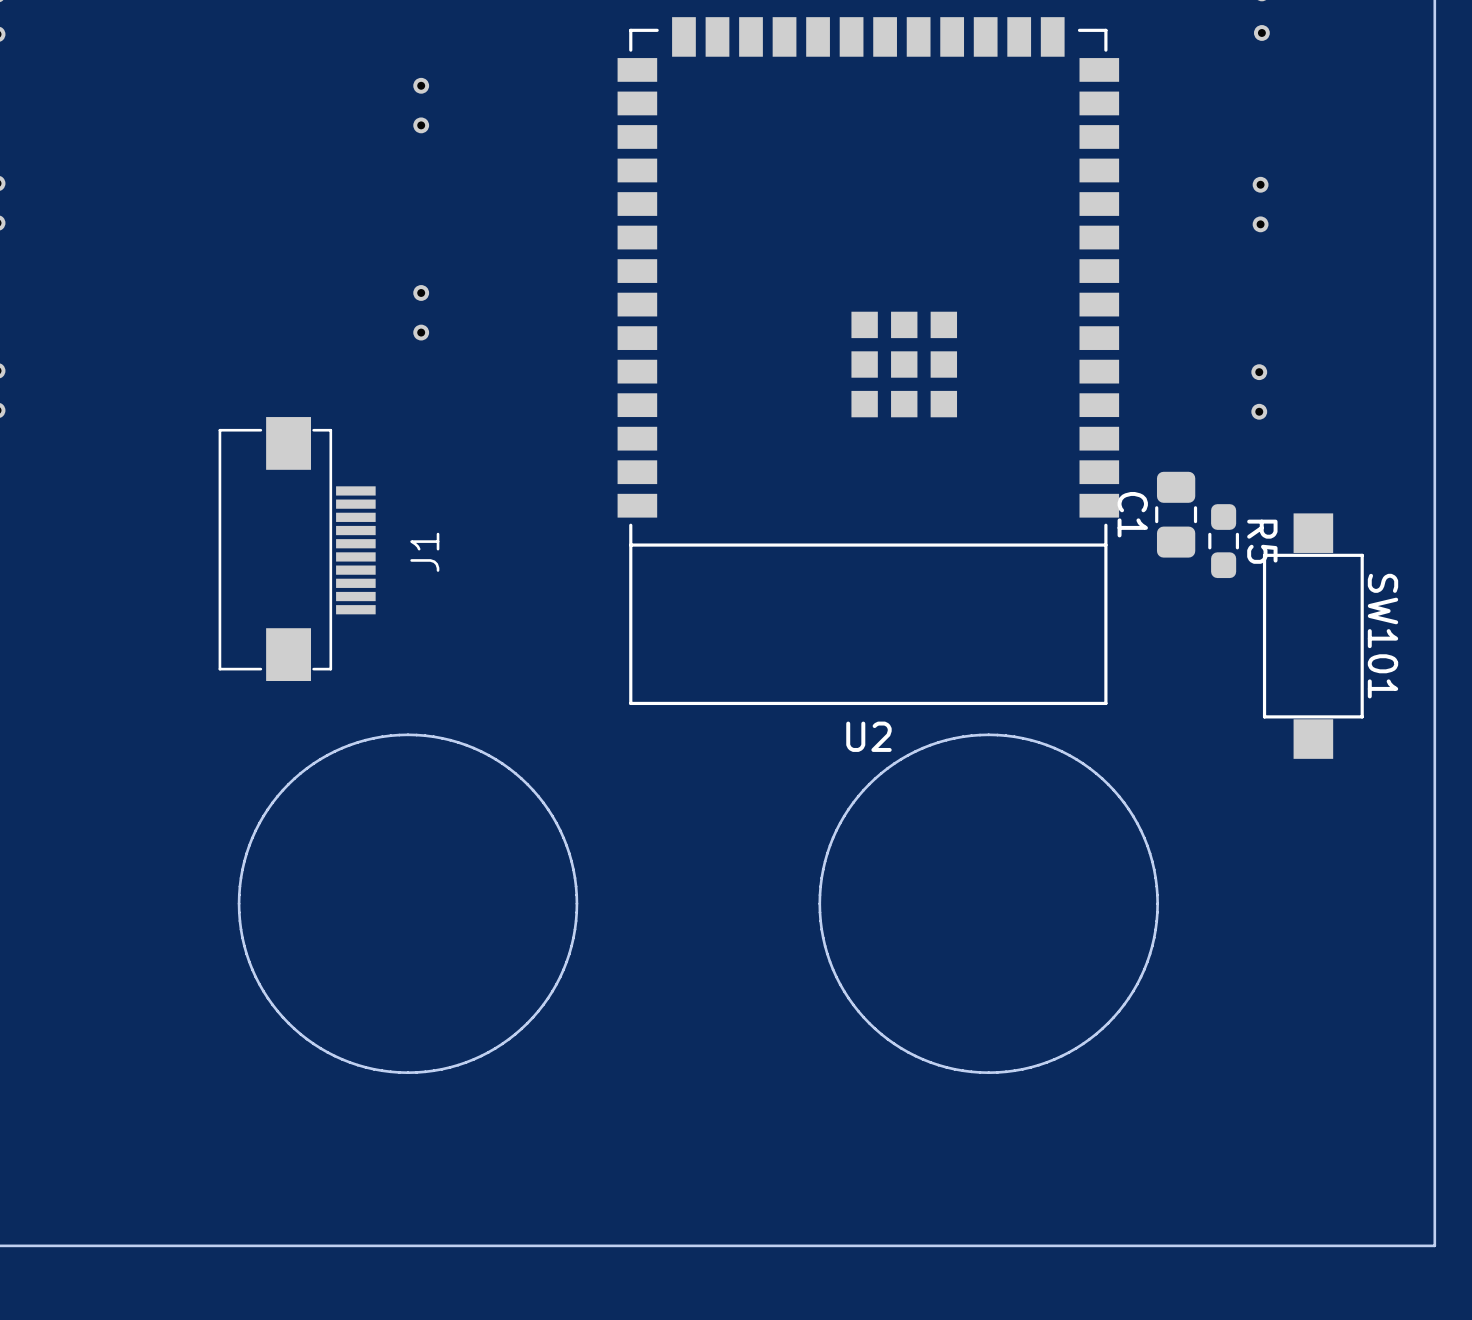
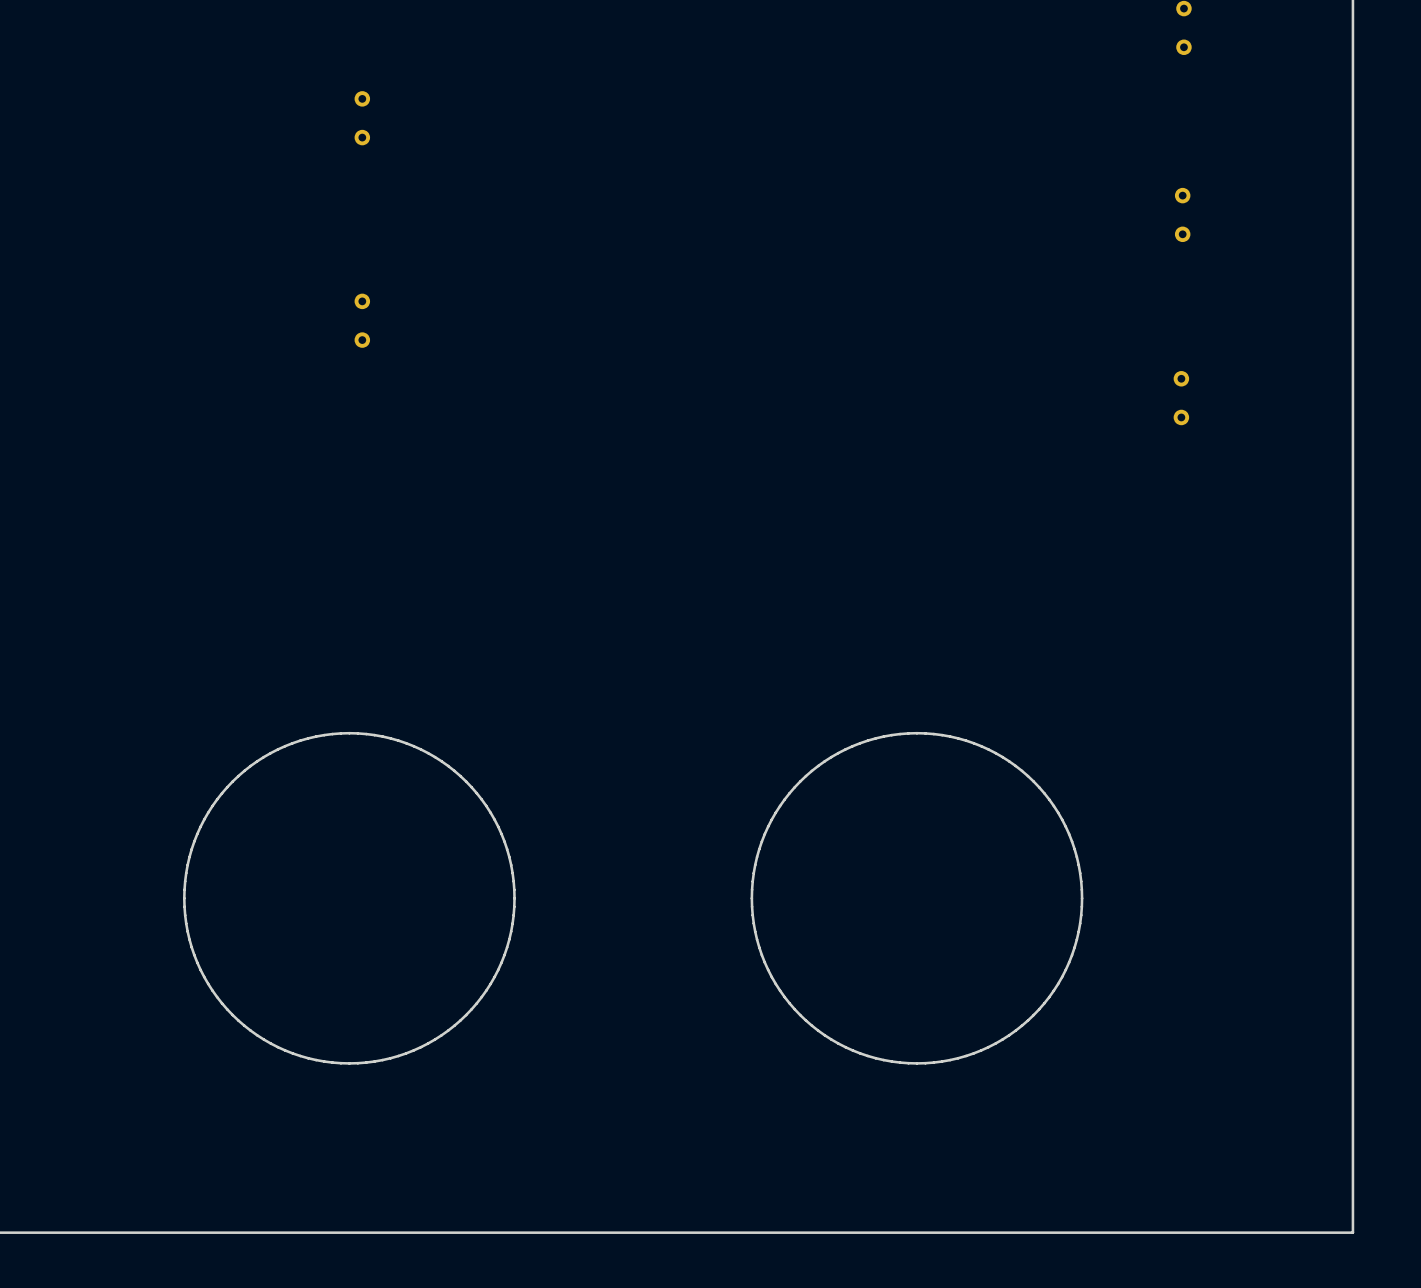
U2: (868, 361) -> none
C1: (1176, 514) -> none
R5: (1223, 541) -> none
J1: (297, 549) -> none
SW101: (1313, 636) -> none

